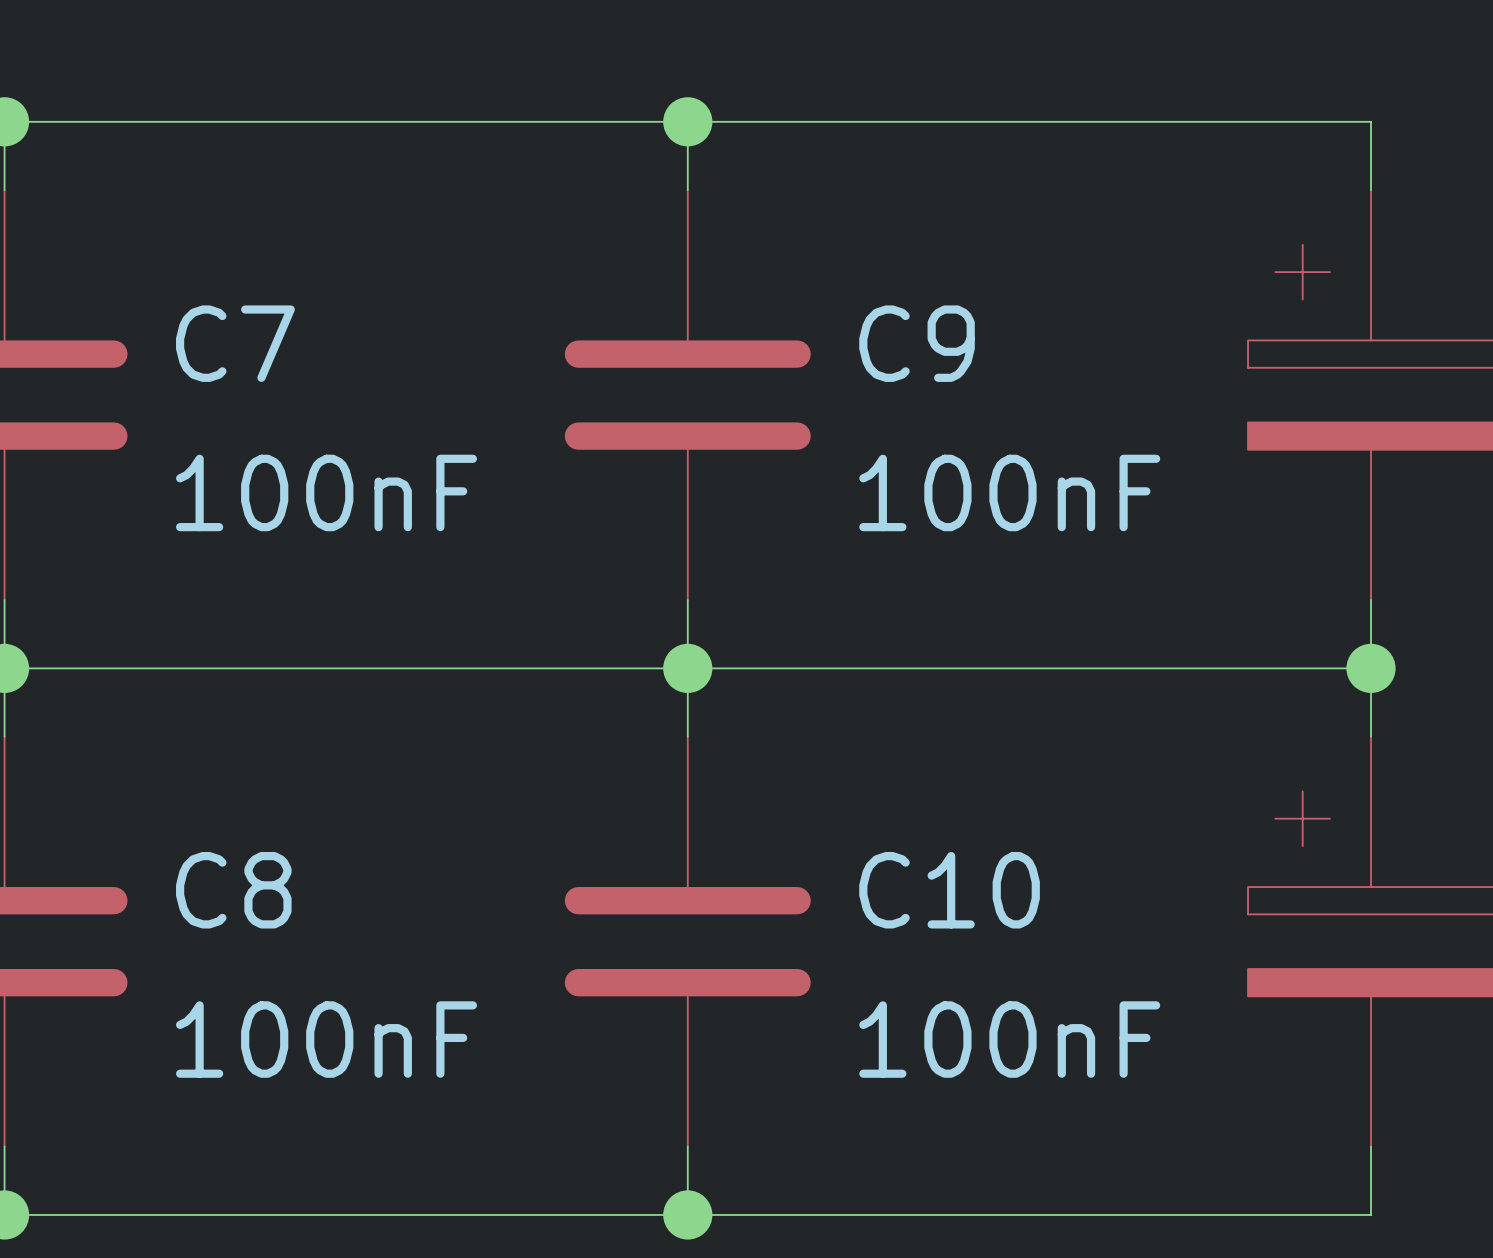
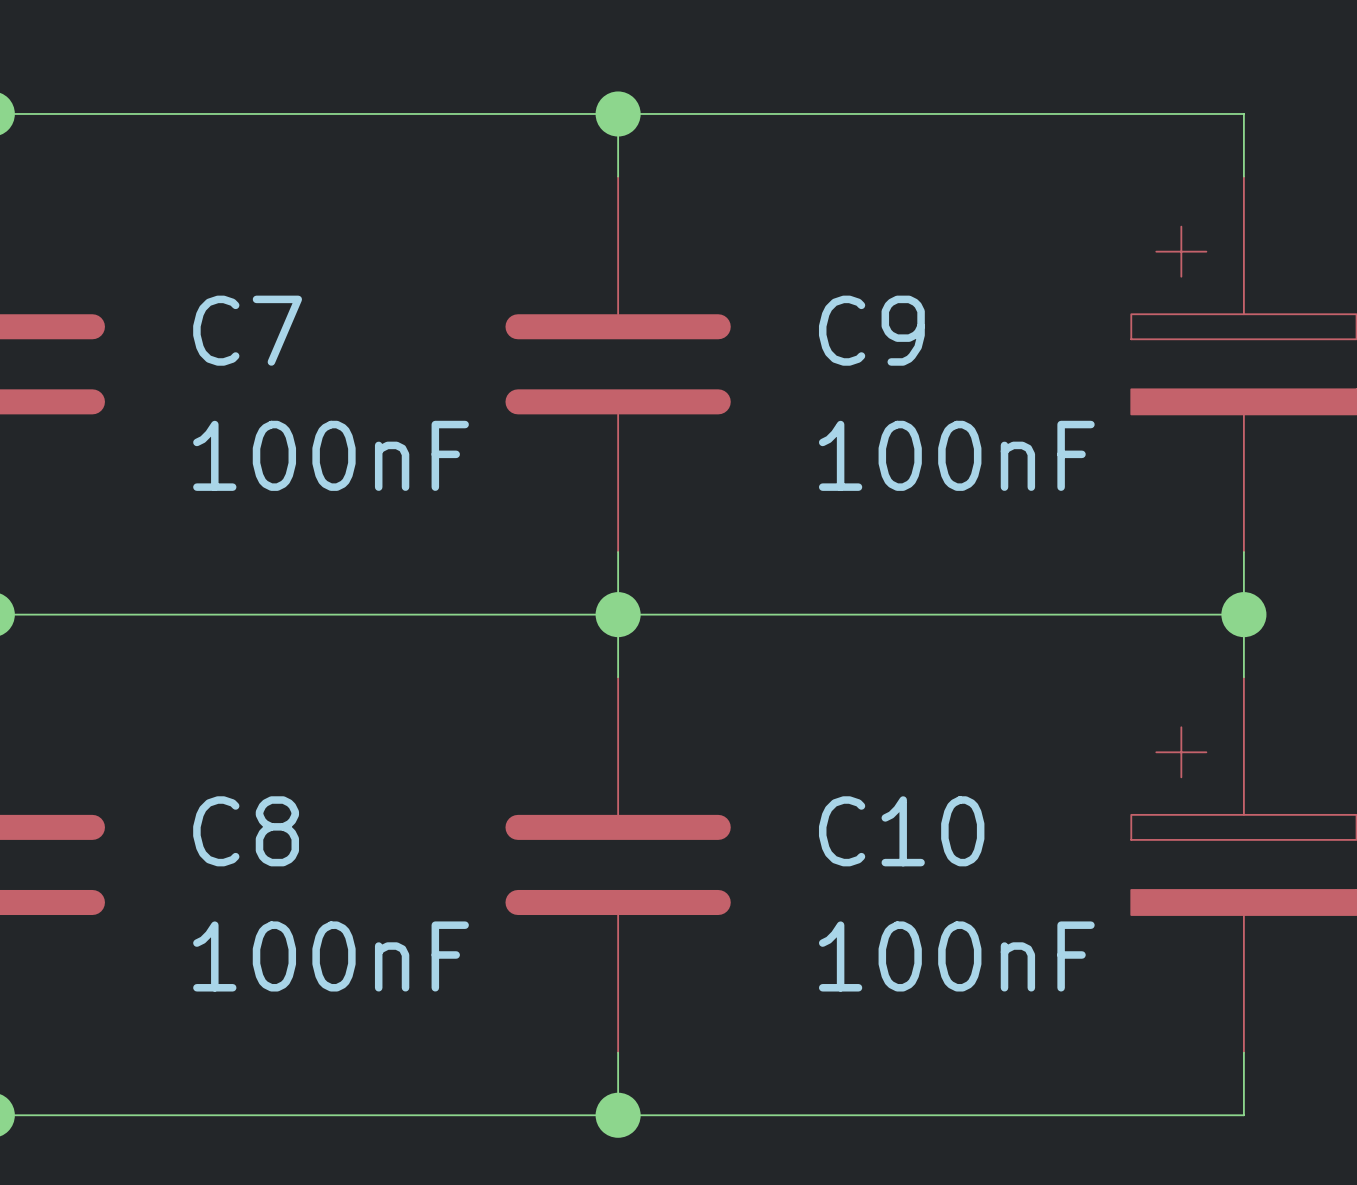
C7 name position: C7 (235, 343) -> C7 (247, 330)
C9 name position: C9 (917, 343) -> C9 (871, 330)
C7 value position: 100nF (326, 492) -> 100nF (331, 455)
C9 value position: 100nF (1009, 492) -> 100nF (956, 455)
C8 name position: C8 (233, 890) -> C8 (246, 831)
C10 name position: C10 (949, 890) -> C10 (901, 831)
C8 value position: 100nF (326, 1039) -> 100nF (331, 956)
C10 value position: 100nF (1009, 1039) -> 100nF (956, 956)

